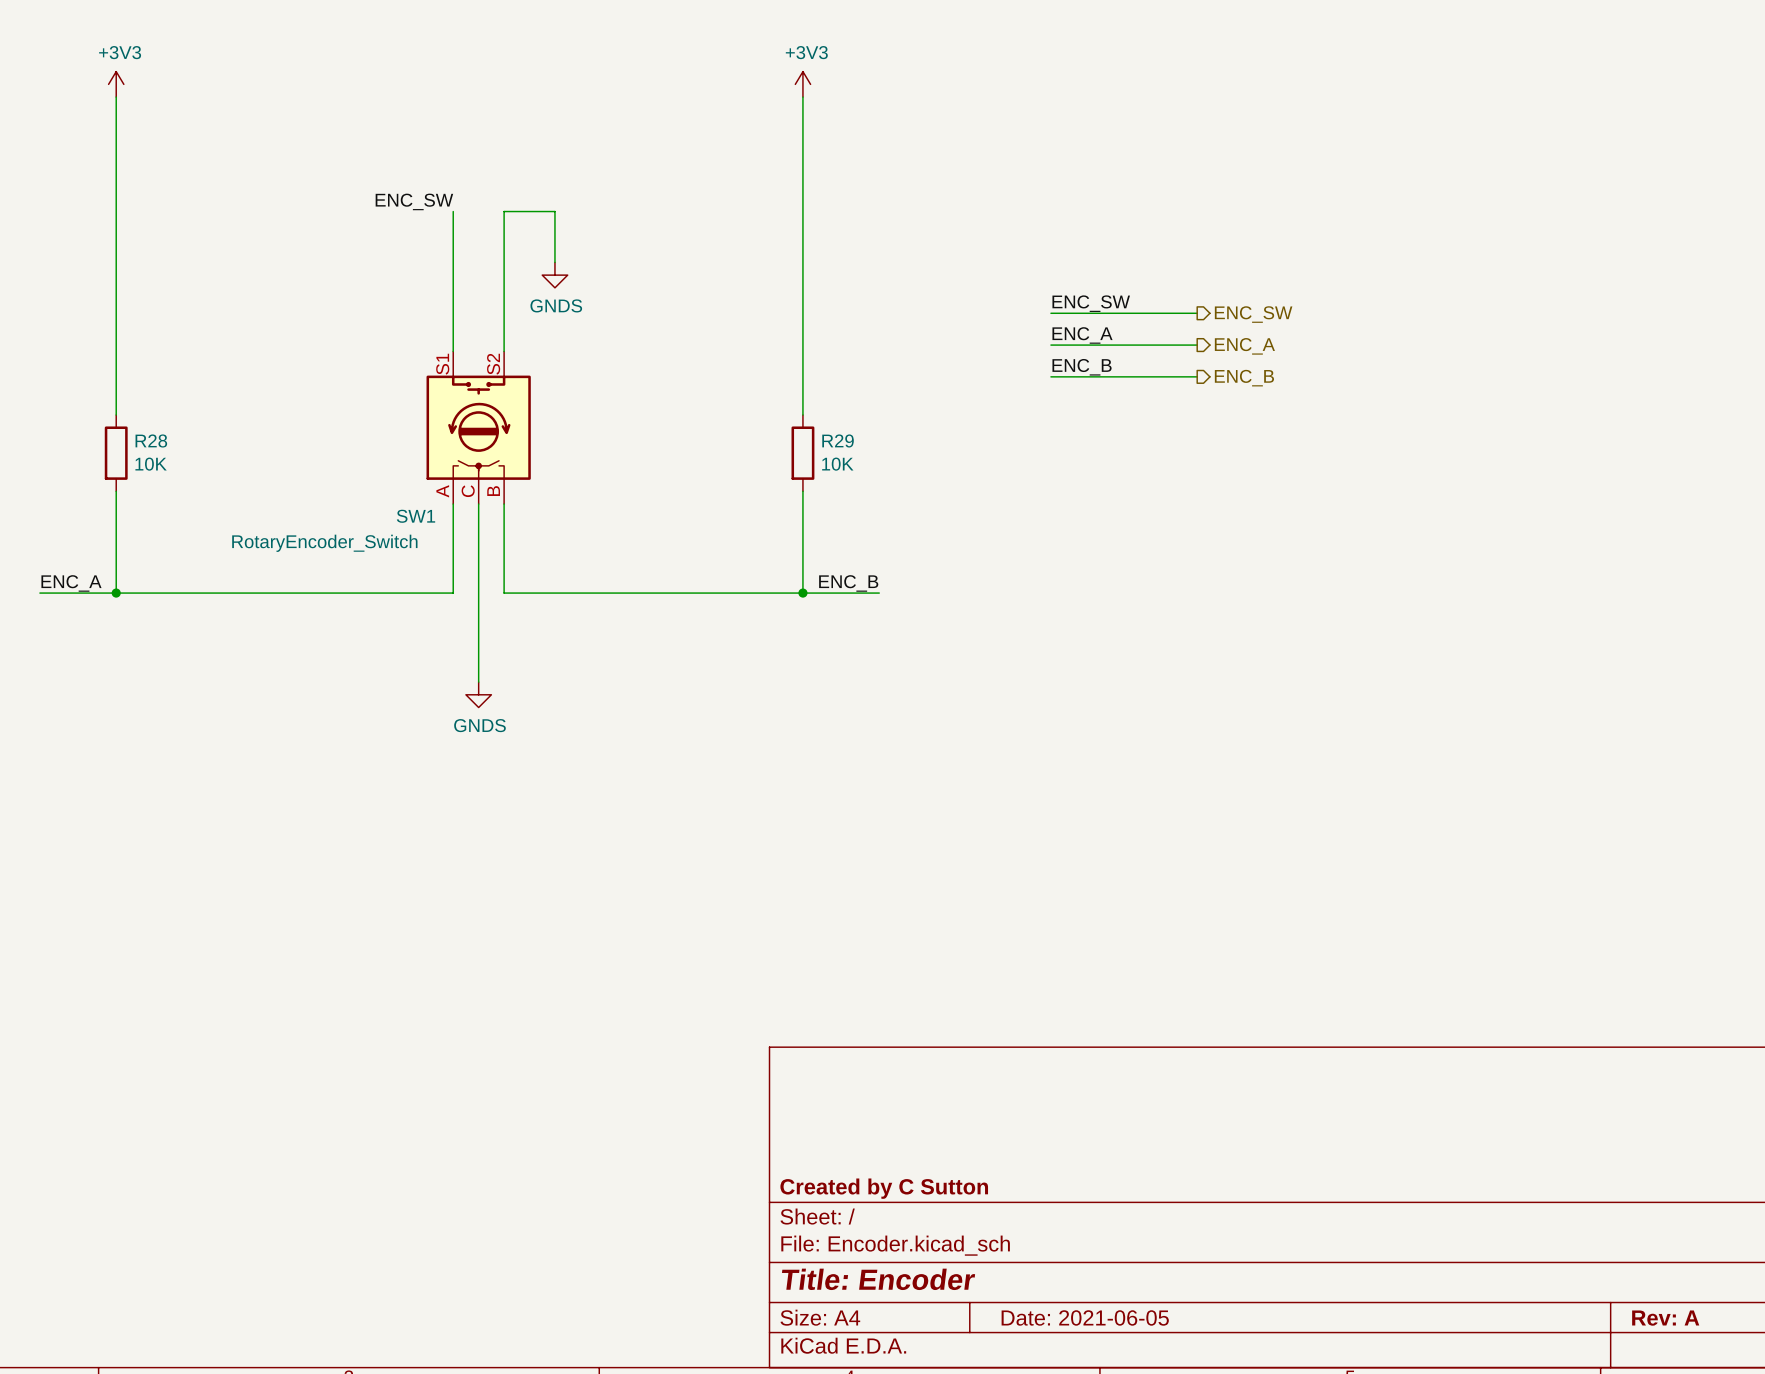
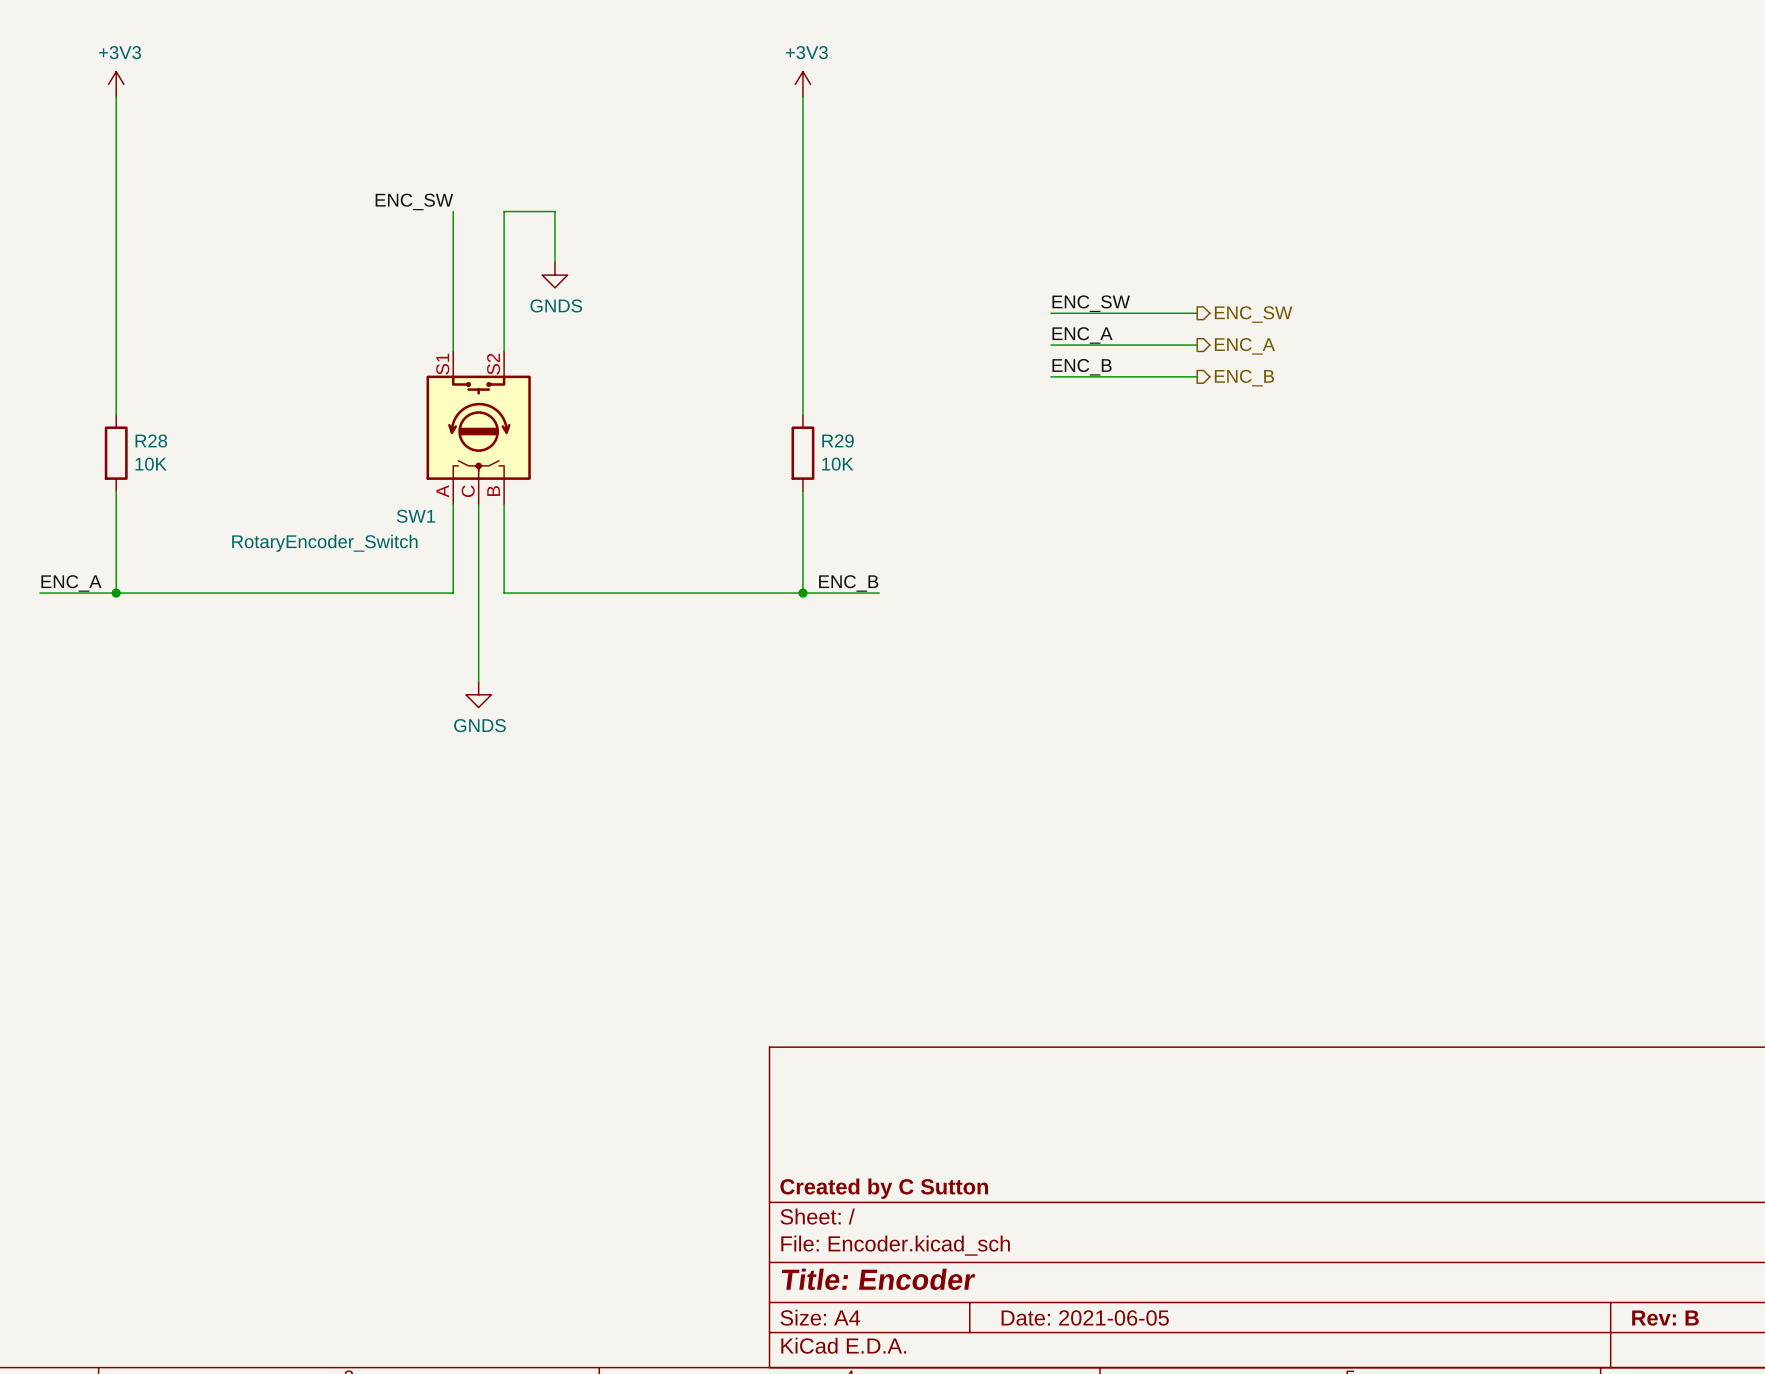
title block: Rev: A (1665, 1318) -> Rev: B (1665, 1318)

